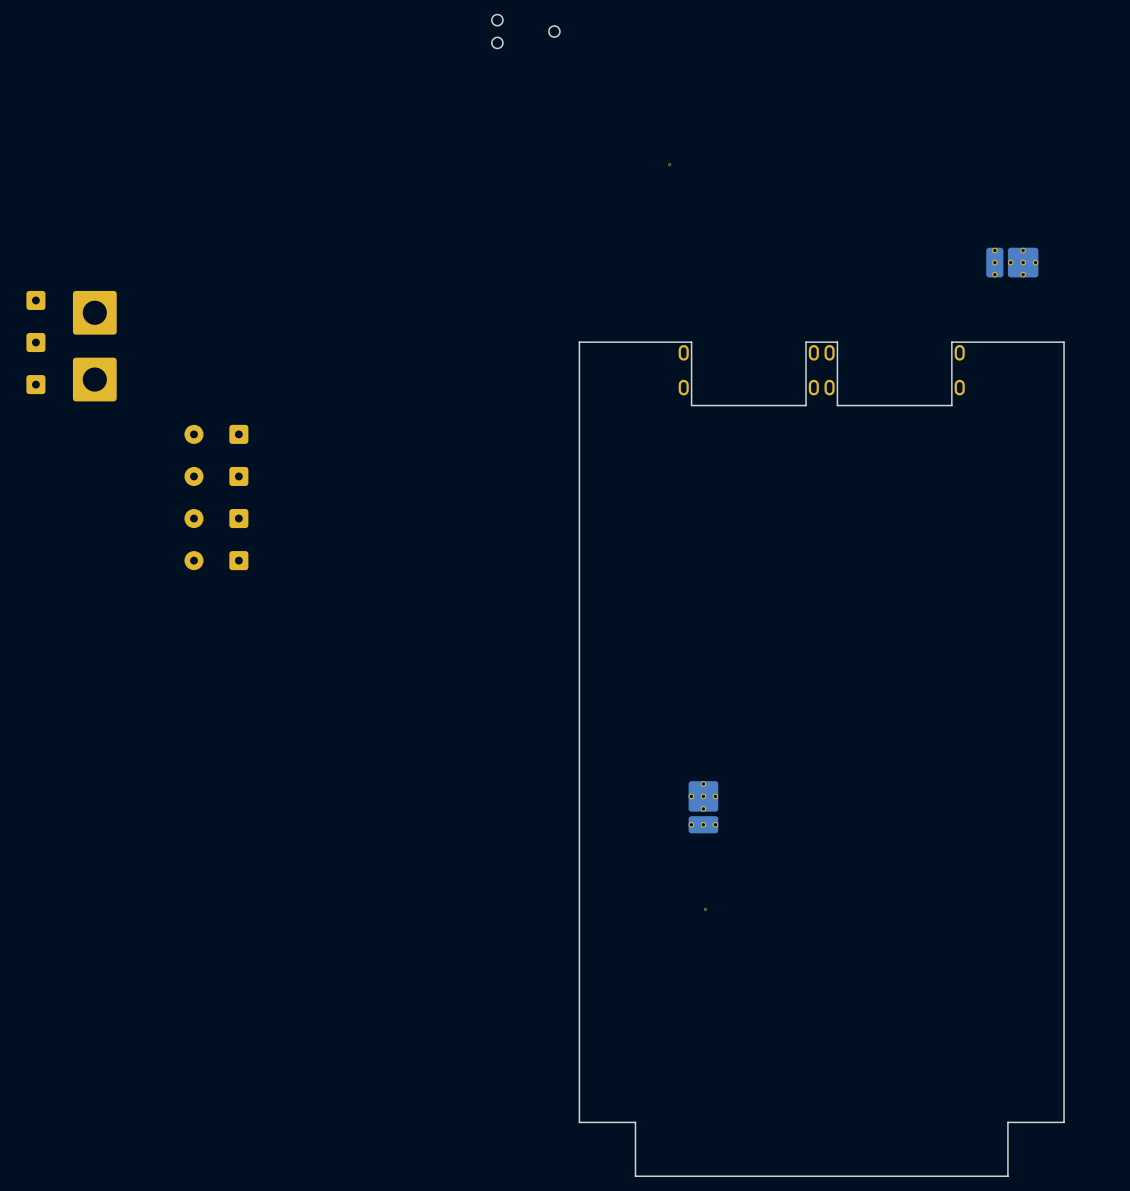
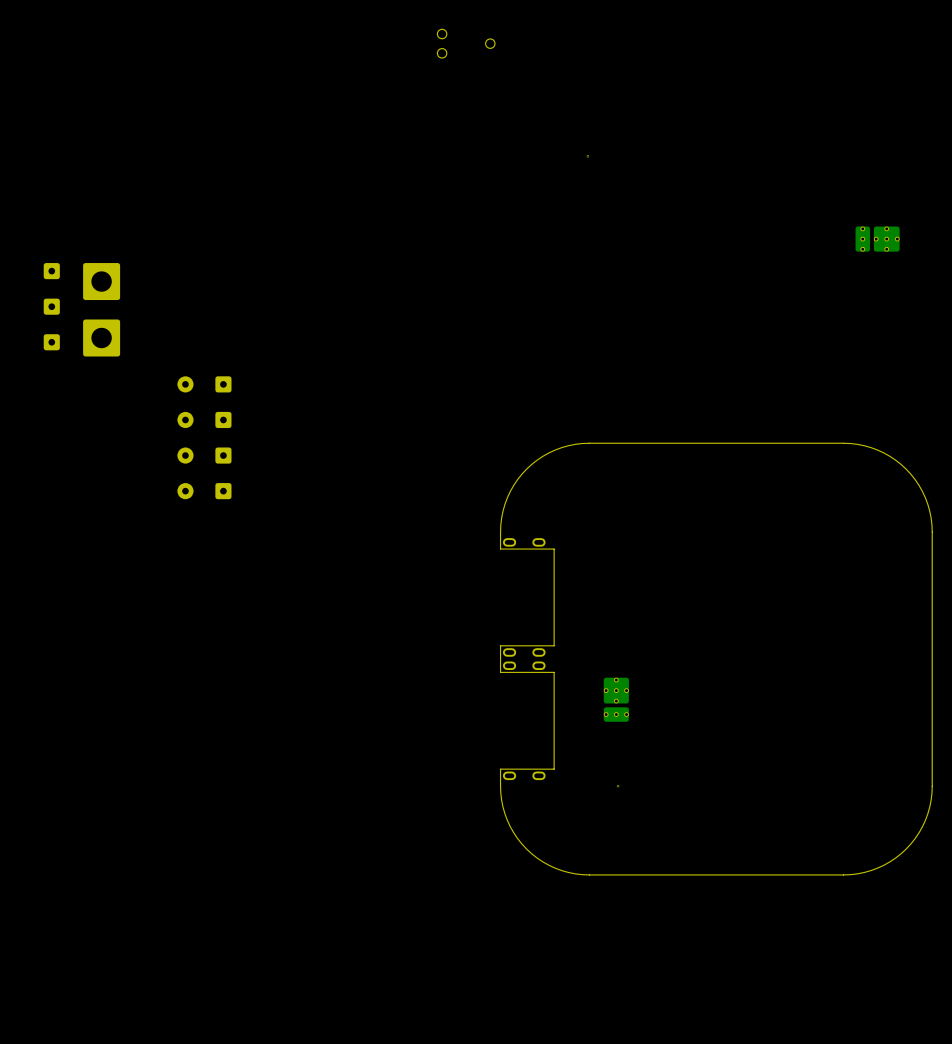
board edge: (837, 342) (806, 342) -> none
board edge: (951, 342) (1064, 342) (1064, 1122) (1007, 1122) (1007, 1176) (635, 1176) (635, 1122) (579, 1122) (579, 342) (691, 342) -> none
part: (748, 373) -> none
part: (894, 373) -> none
board edge: none -> (500, 549) (502, 511) (510, 491) (517, 479) (531, 464) (548, 452) (568, 445) (582, 443) (843, 443) (864, 445) (889, 456) (910, 474) (925, 498) (931, 525) (931, 800) (925, 820) (915, 838) (901, 853) (889, 861) (864, 872) (843, 874) (589, 874) (568, 872) (548, 865) (537, 858) (521, 843) (513, 832) (502, 806) (500, 769)
part: none -> (527, 597)
board edge: none -> (500, 645) (500, 672)
part: none -> (527, 720)

